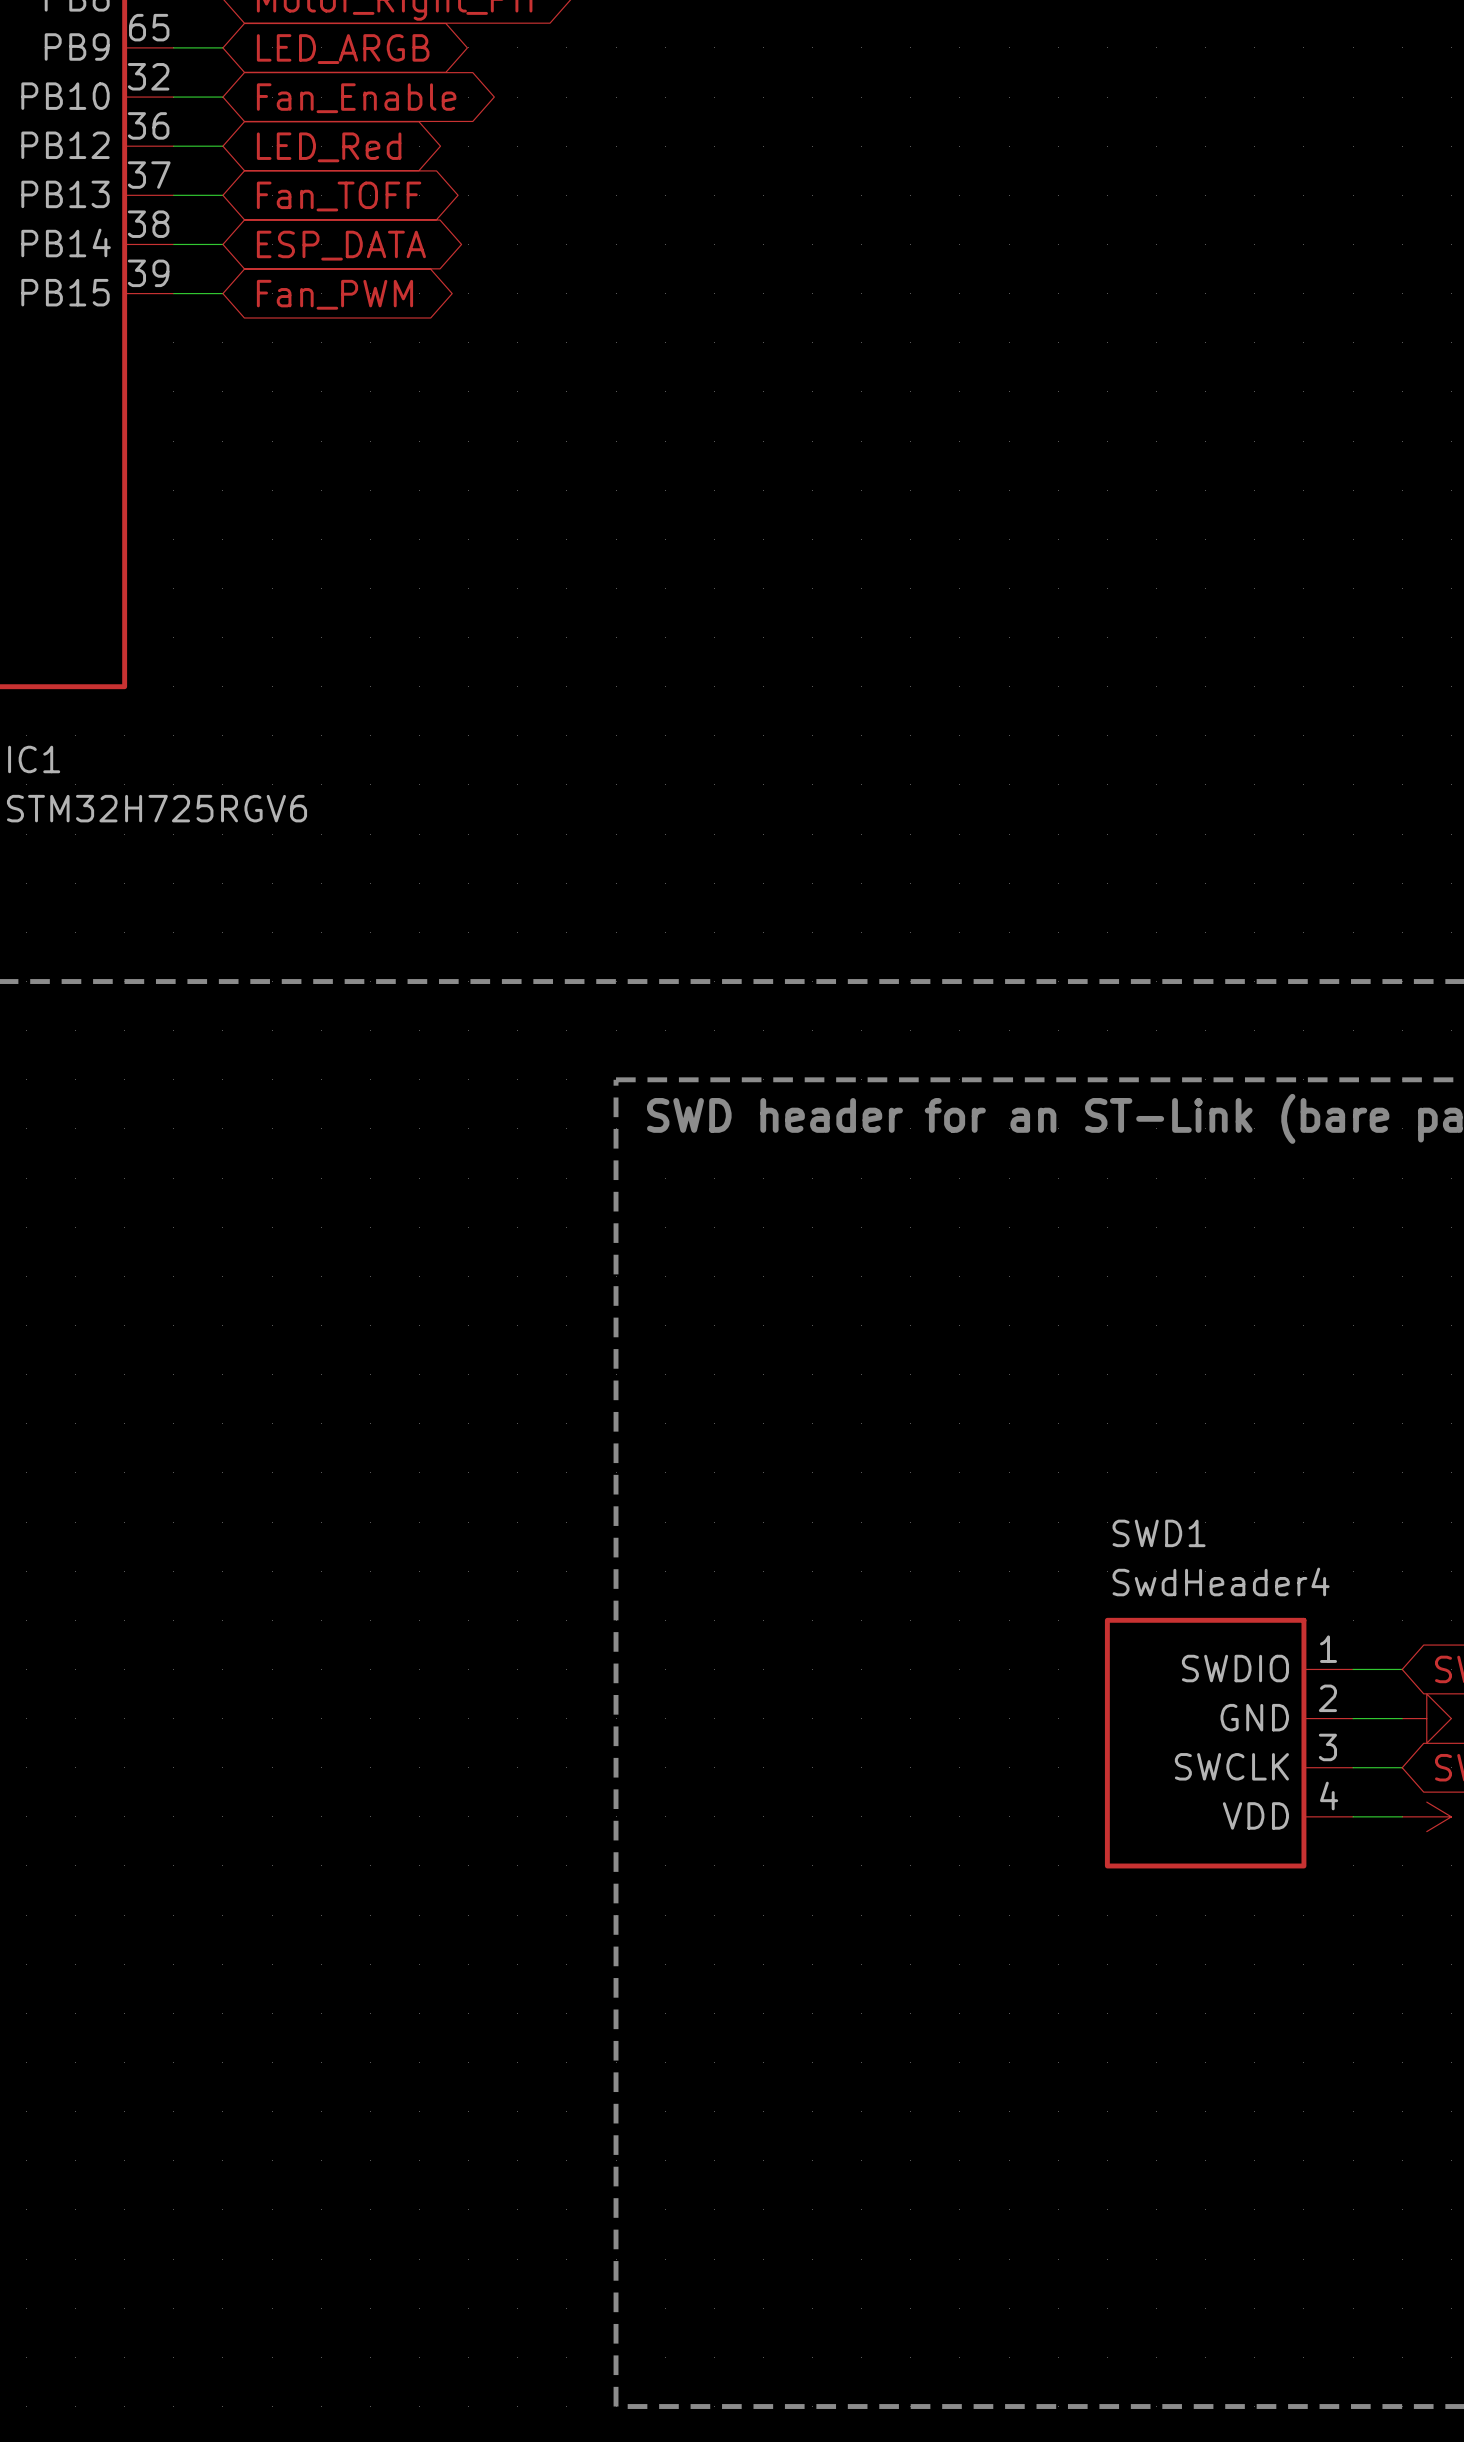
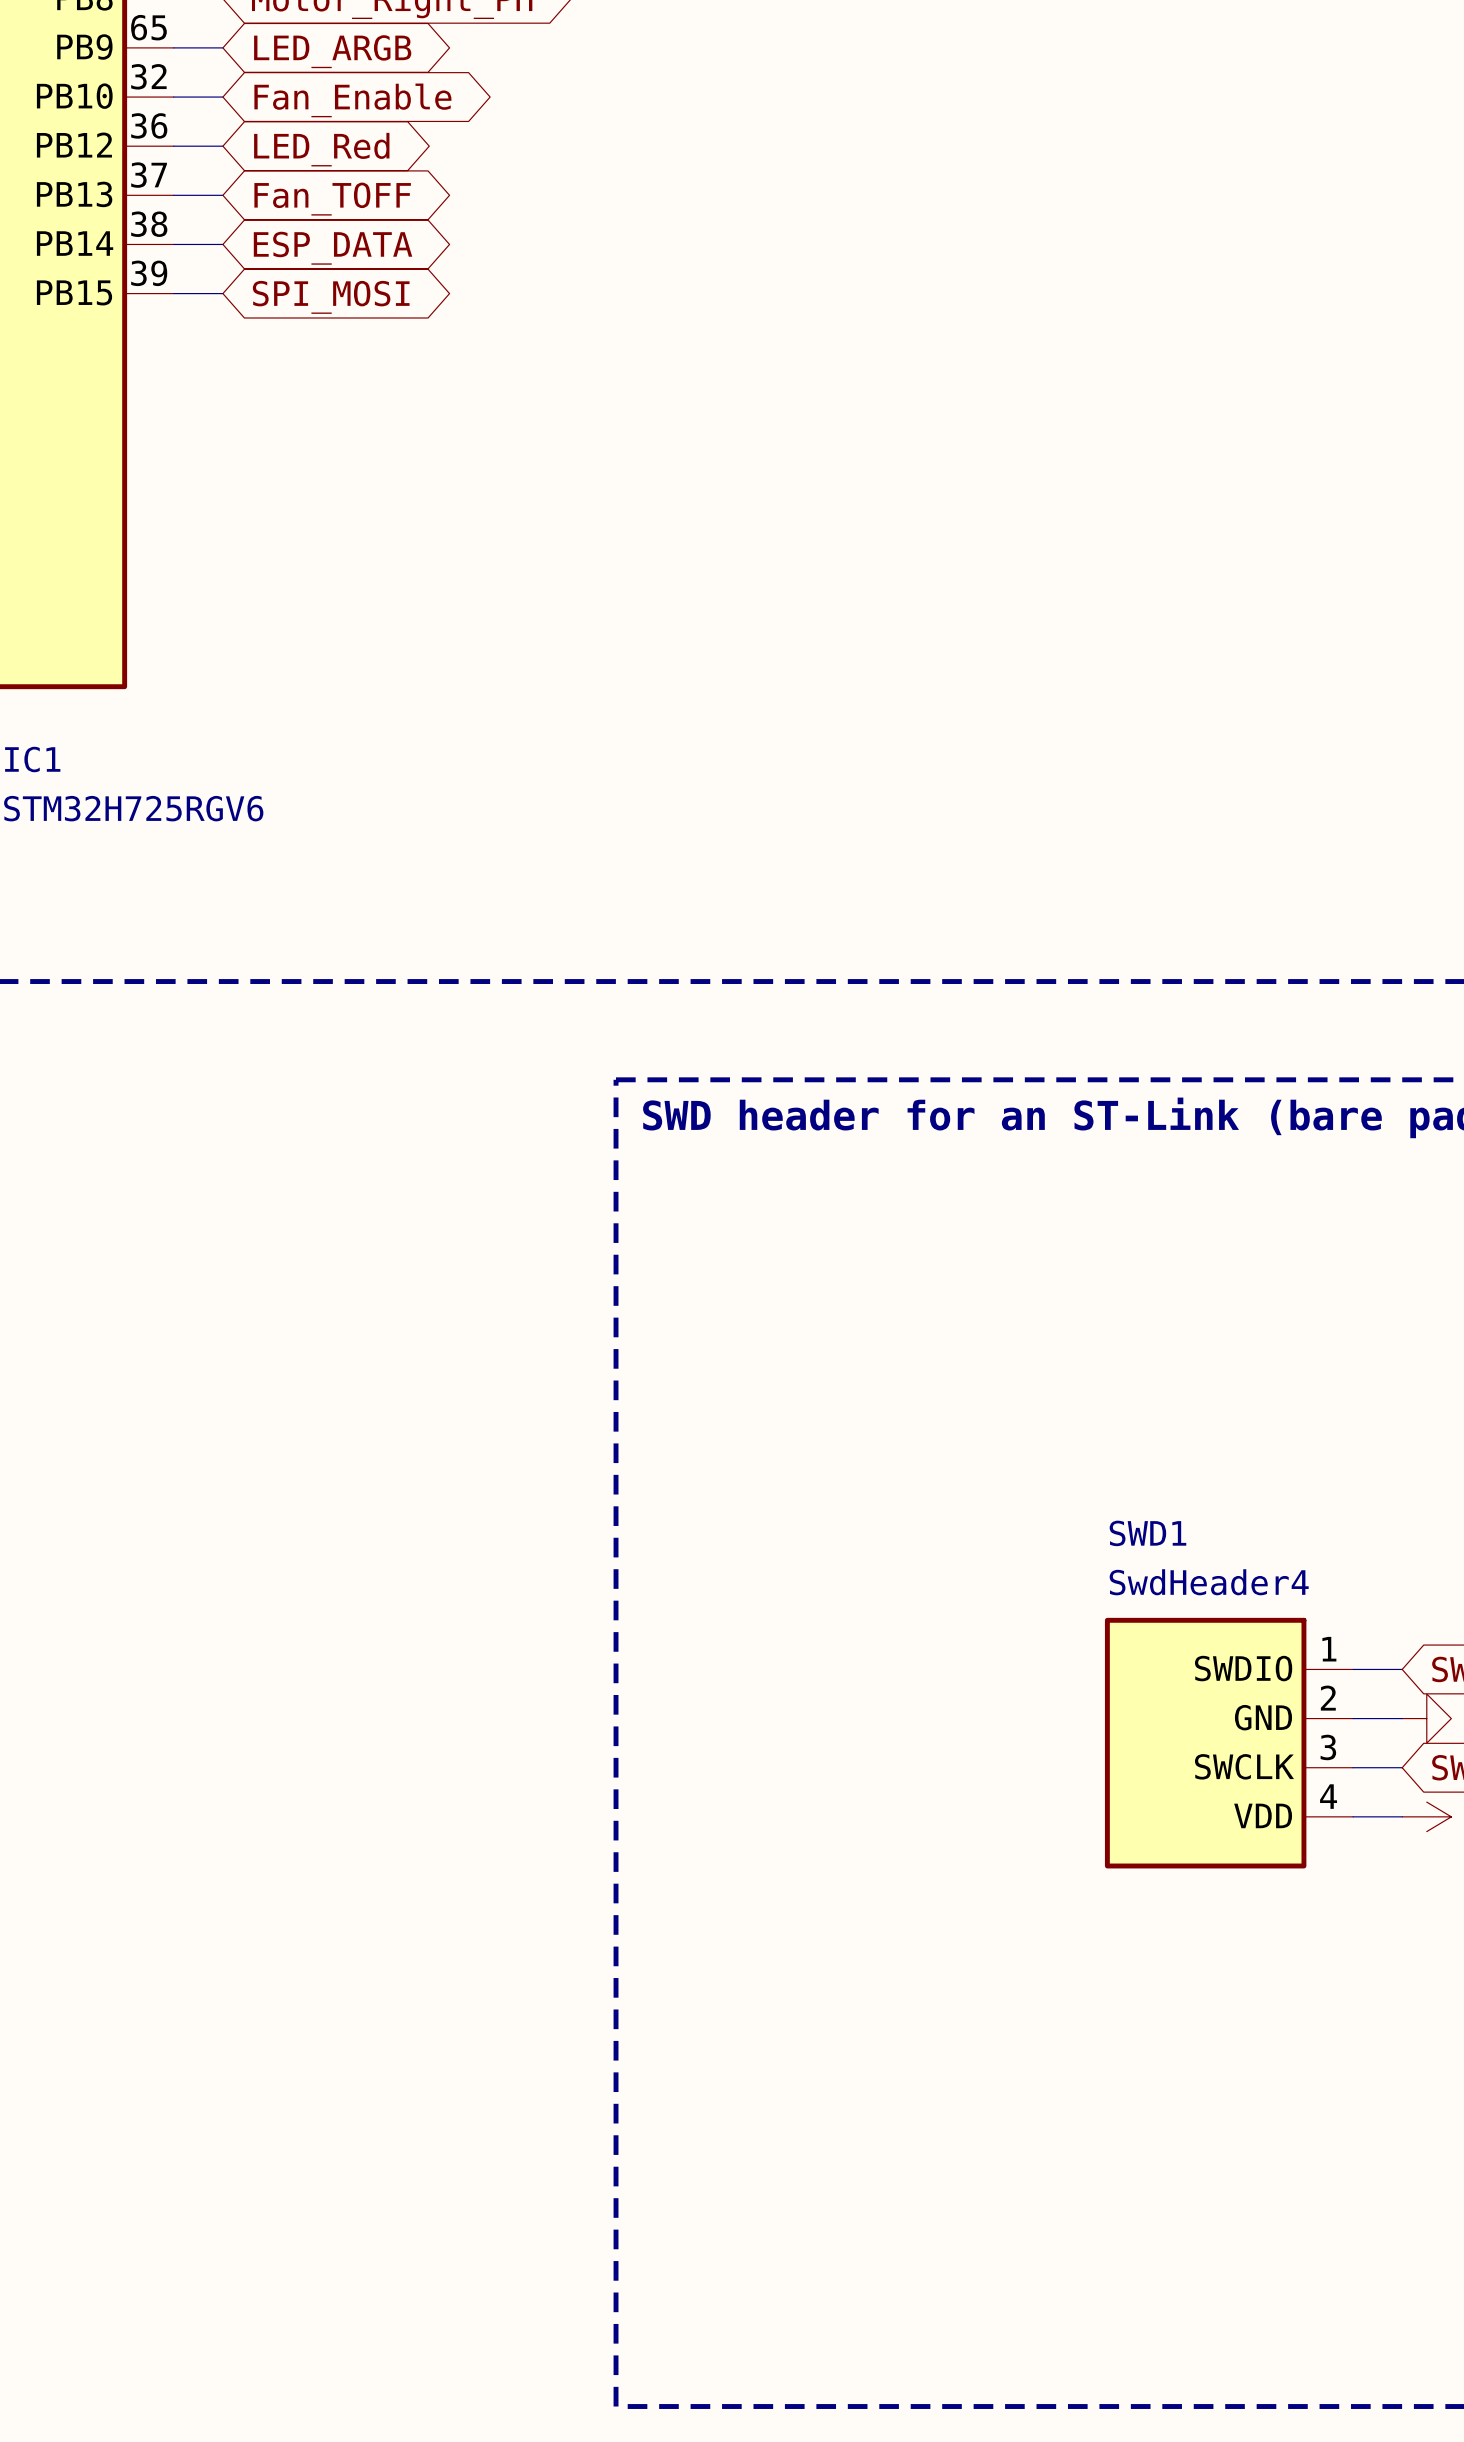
global label: Fan_PWM (334, 294) -> SPI_MOSI (331, 297)

